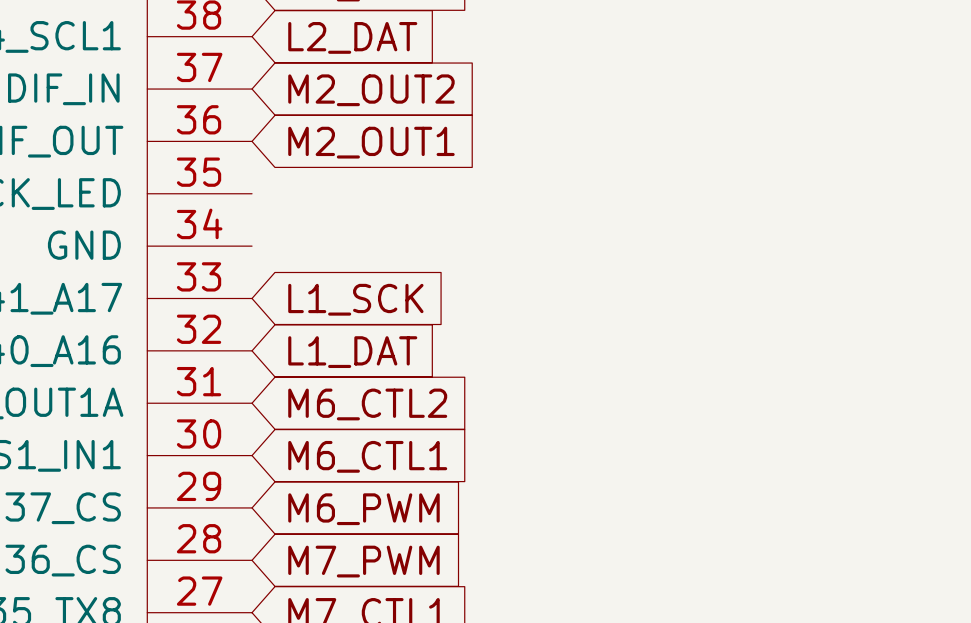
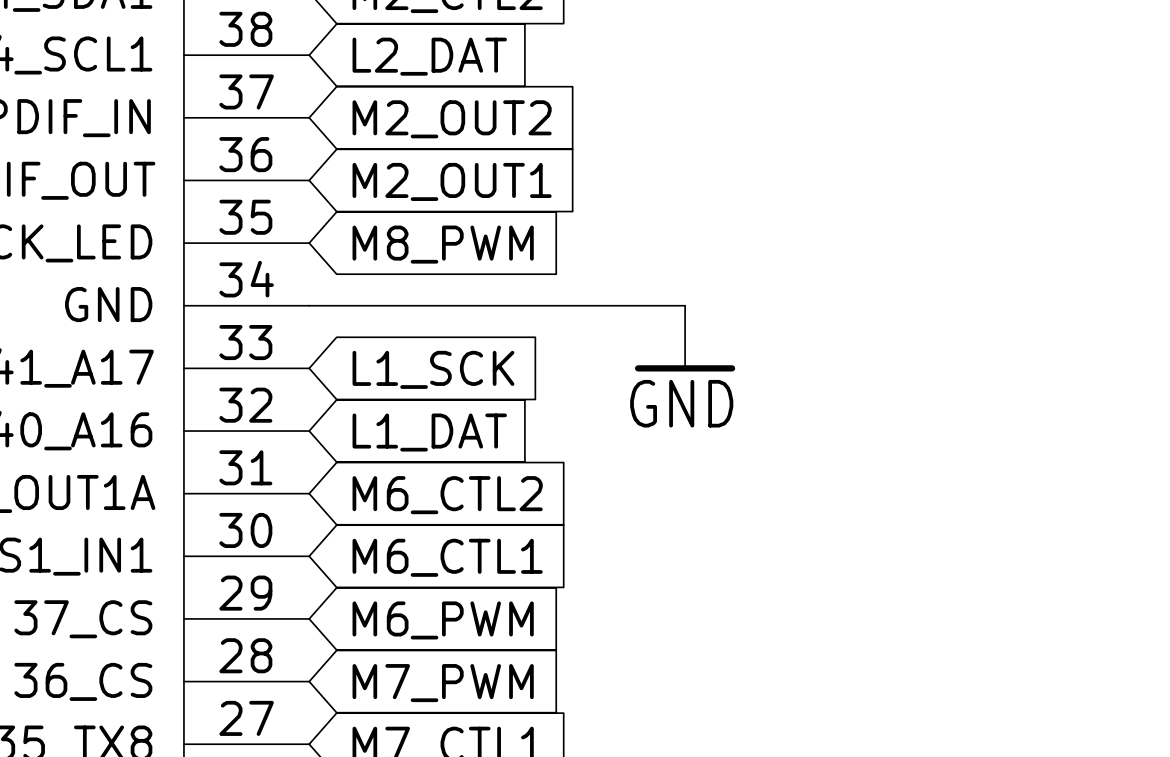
global label: none -> M8_PWM (443, 244)
wire: none -> (309, 305) (685, 305)
power symbol: none -> GND (685, 338)

